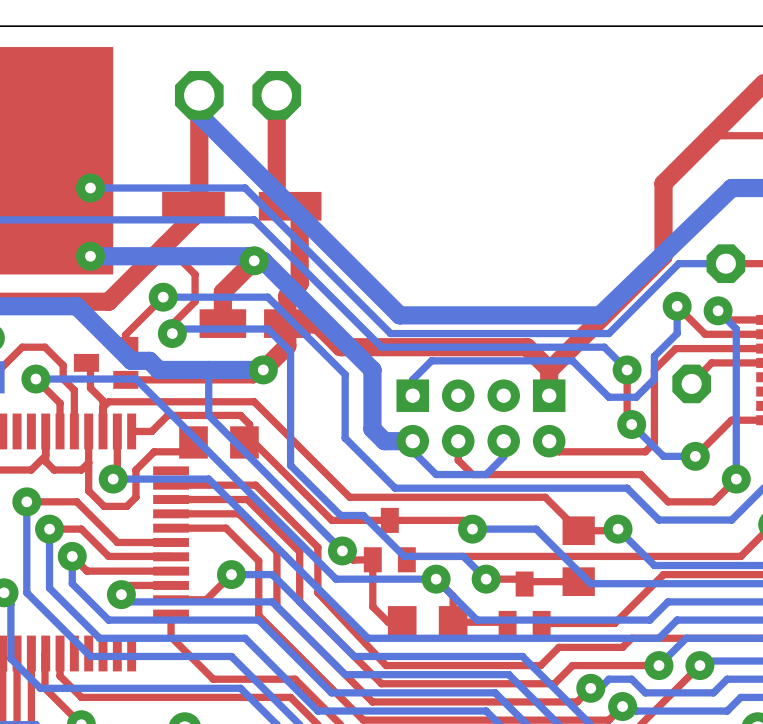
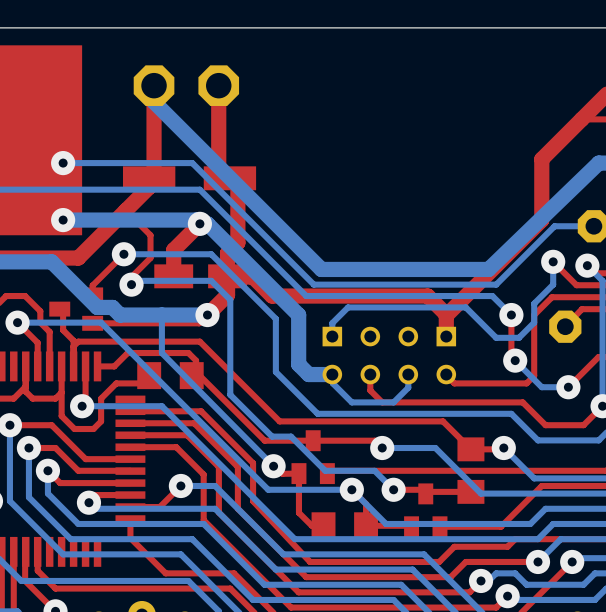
part footprint: [396, 379, 566, 458] -> [322, 326, 457, 385]

